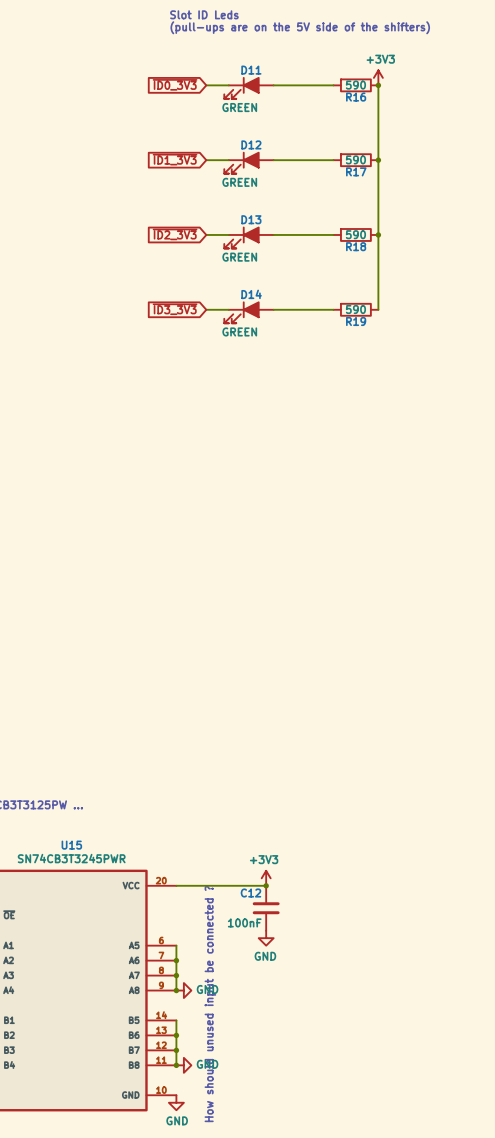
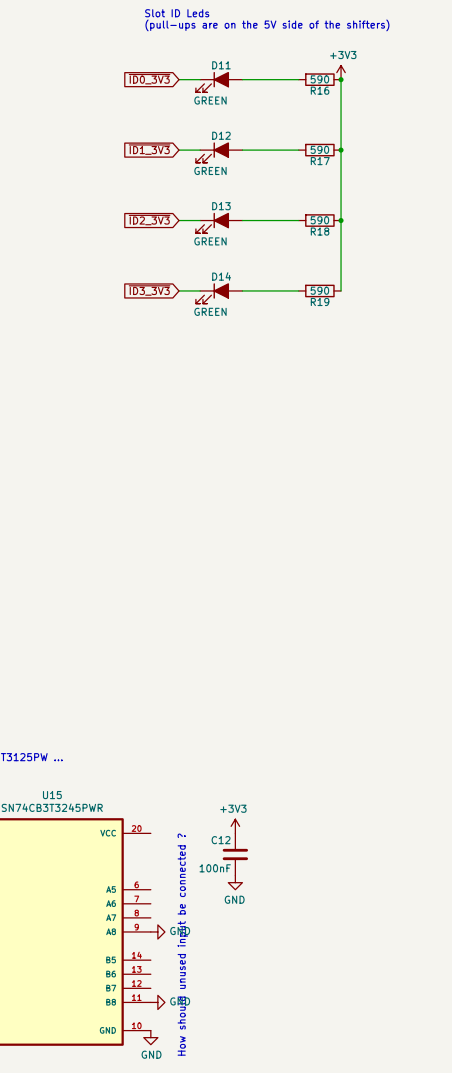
wire: (176, 885) (266, 885) -> none
junction: (266, 885) -> none
wire: (176, 945) (176, 990) -> none
junction: (176, 960) -> none
junction: (176, 975) -> none
junction: (176, 990) -> none
wire: (176, 1020) (176, 1065) -> none
junction: (176, 1035) -> none
junction: (176, 1050) -> none
junction: (176, 1065) -> none

